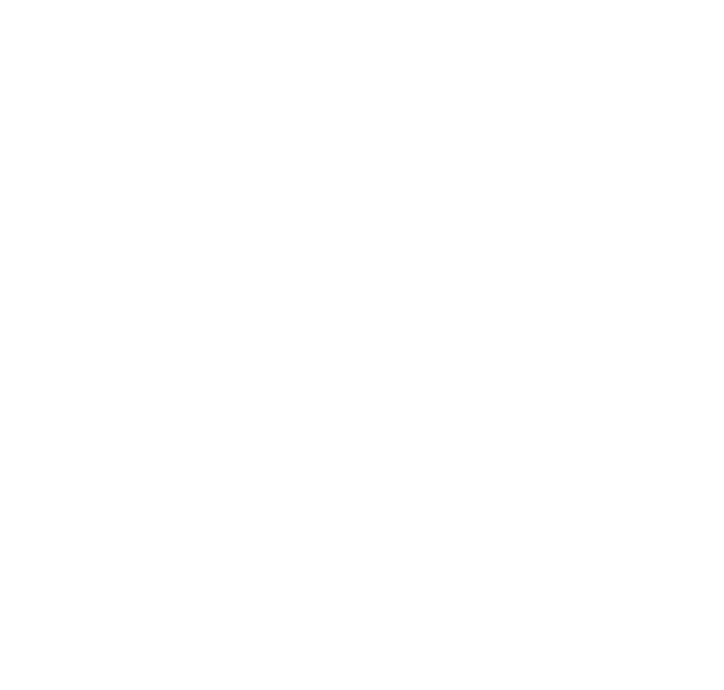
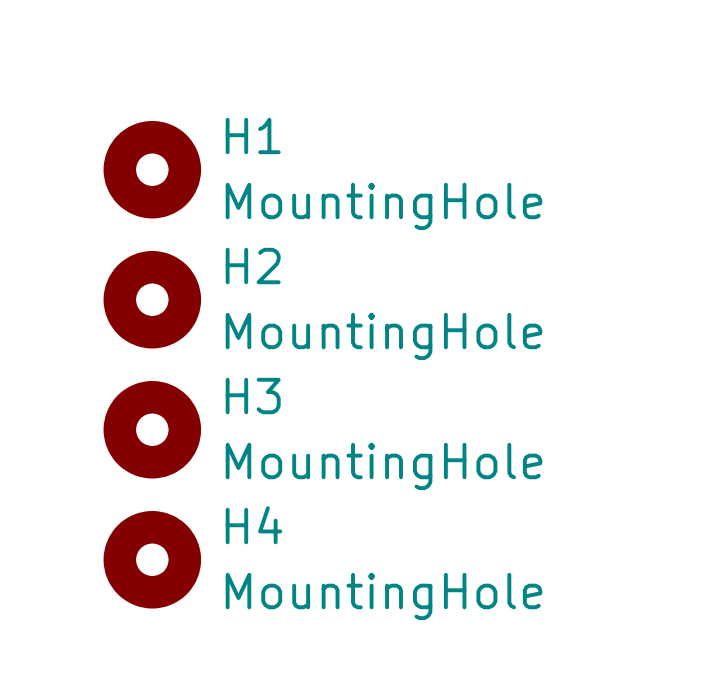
H1: none -> MountingHole (152, 169)
H2: none -> MountingHole (152, 299)
H3: none -> MountingHole (152, 429)
H4: none -> MountingHole (152, 559)

